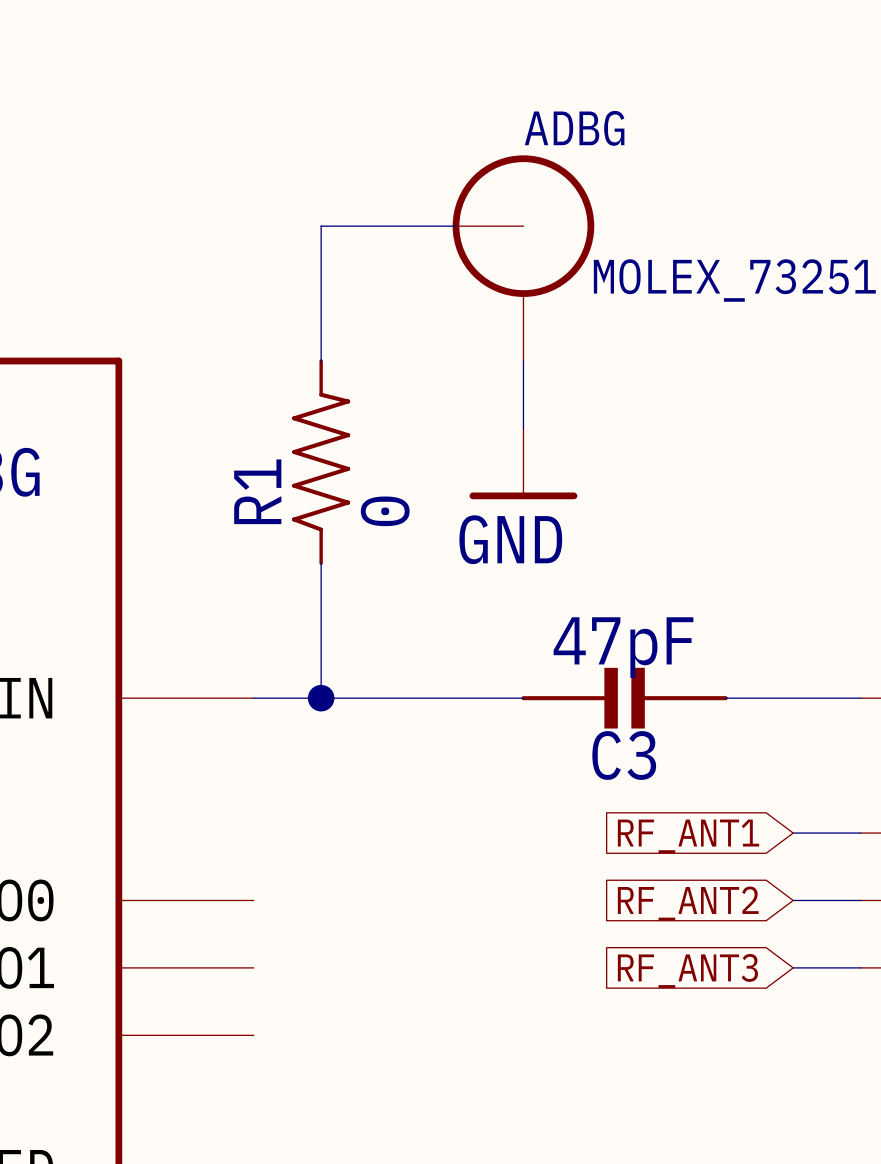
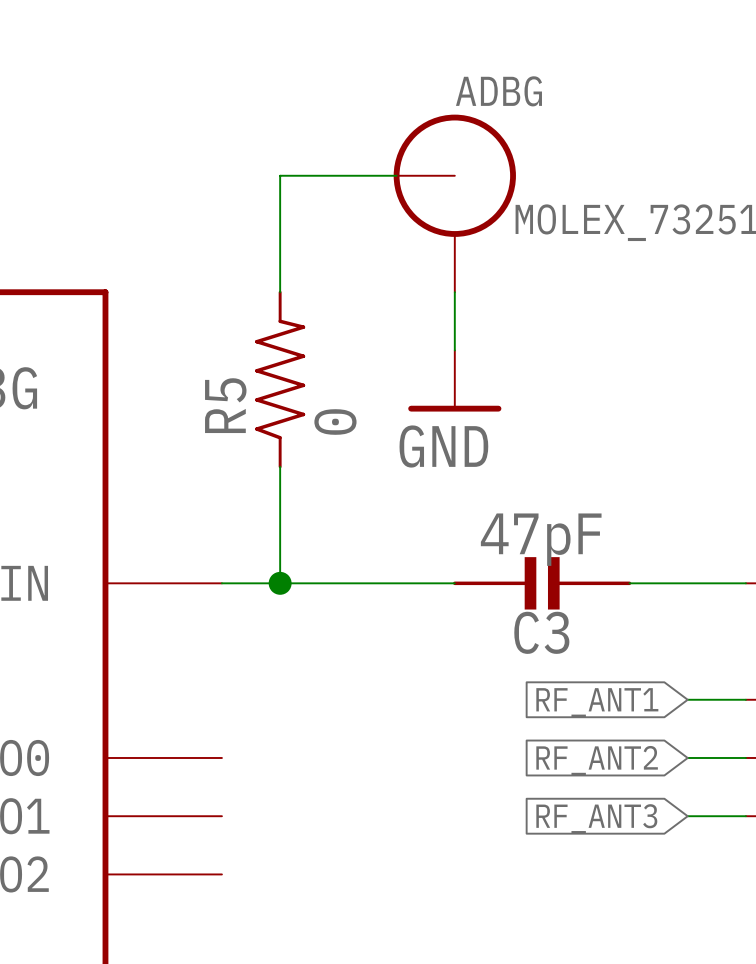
R1 name: R1 (257, 491) -> R5 (225, 405)

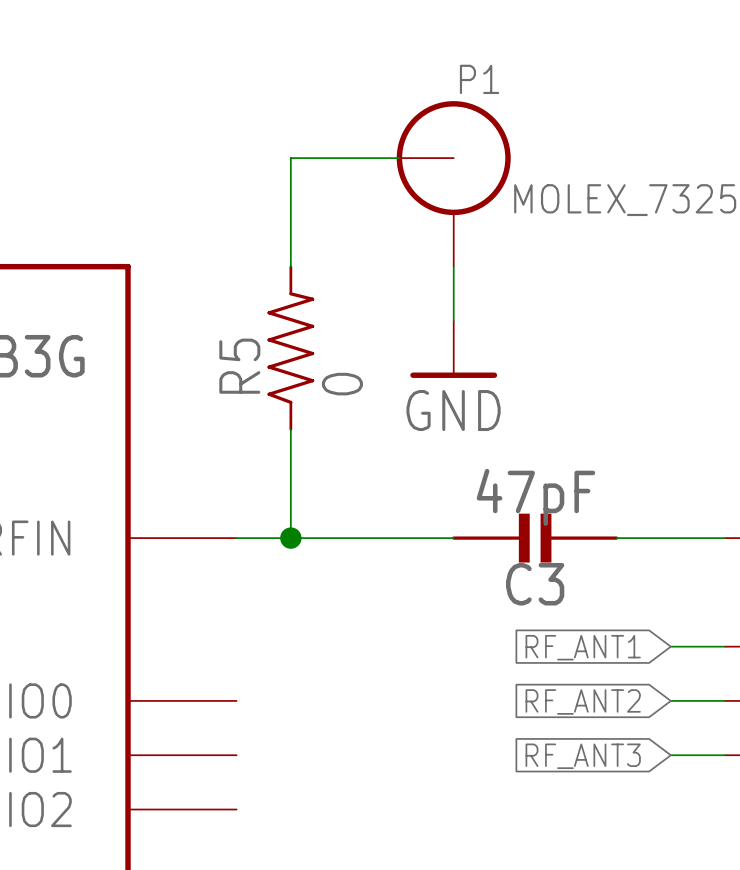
ADBG name: ADBG (498, 91) -> P1 (479, 79)

